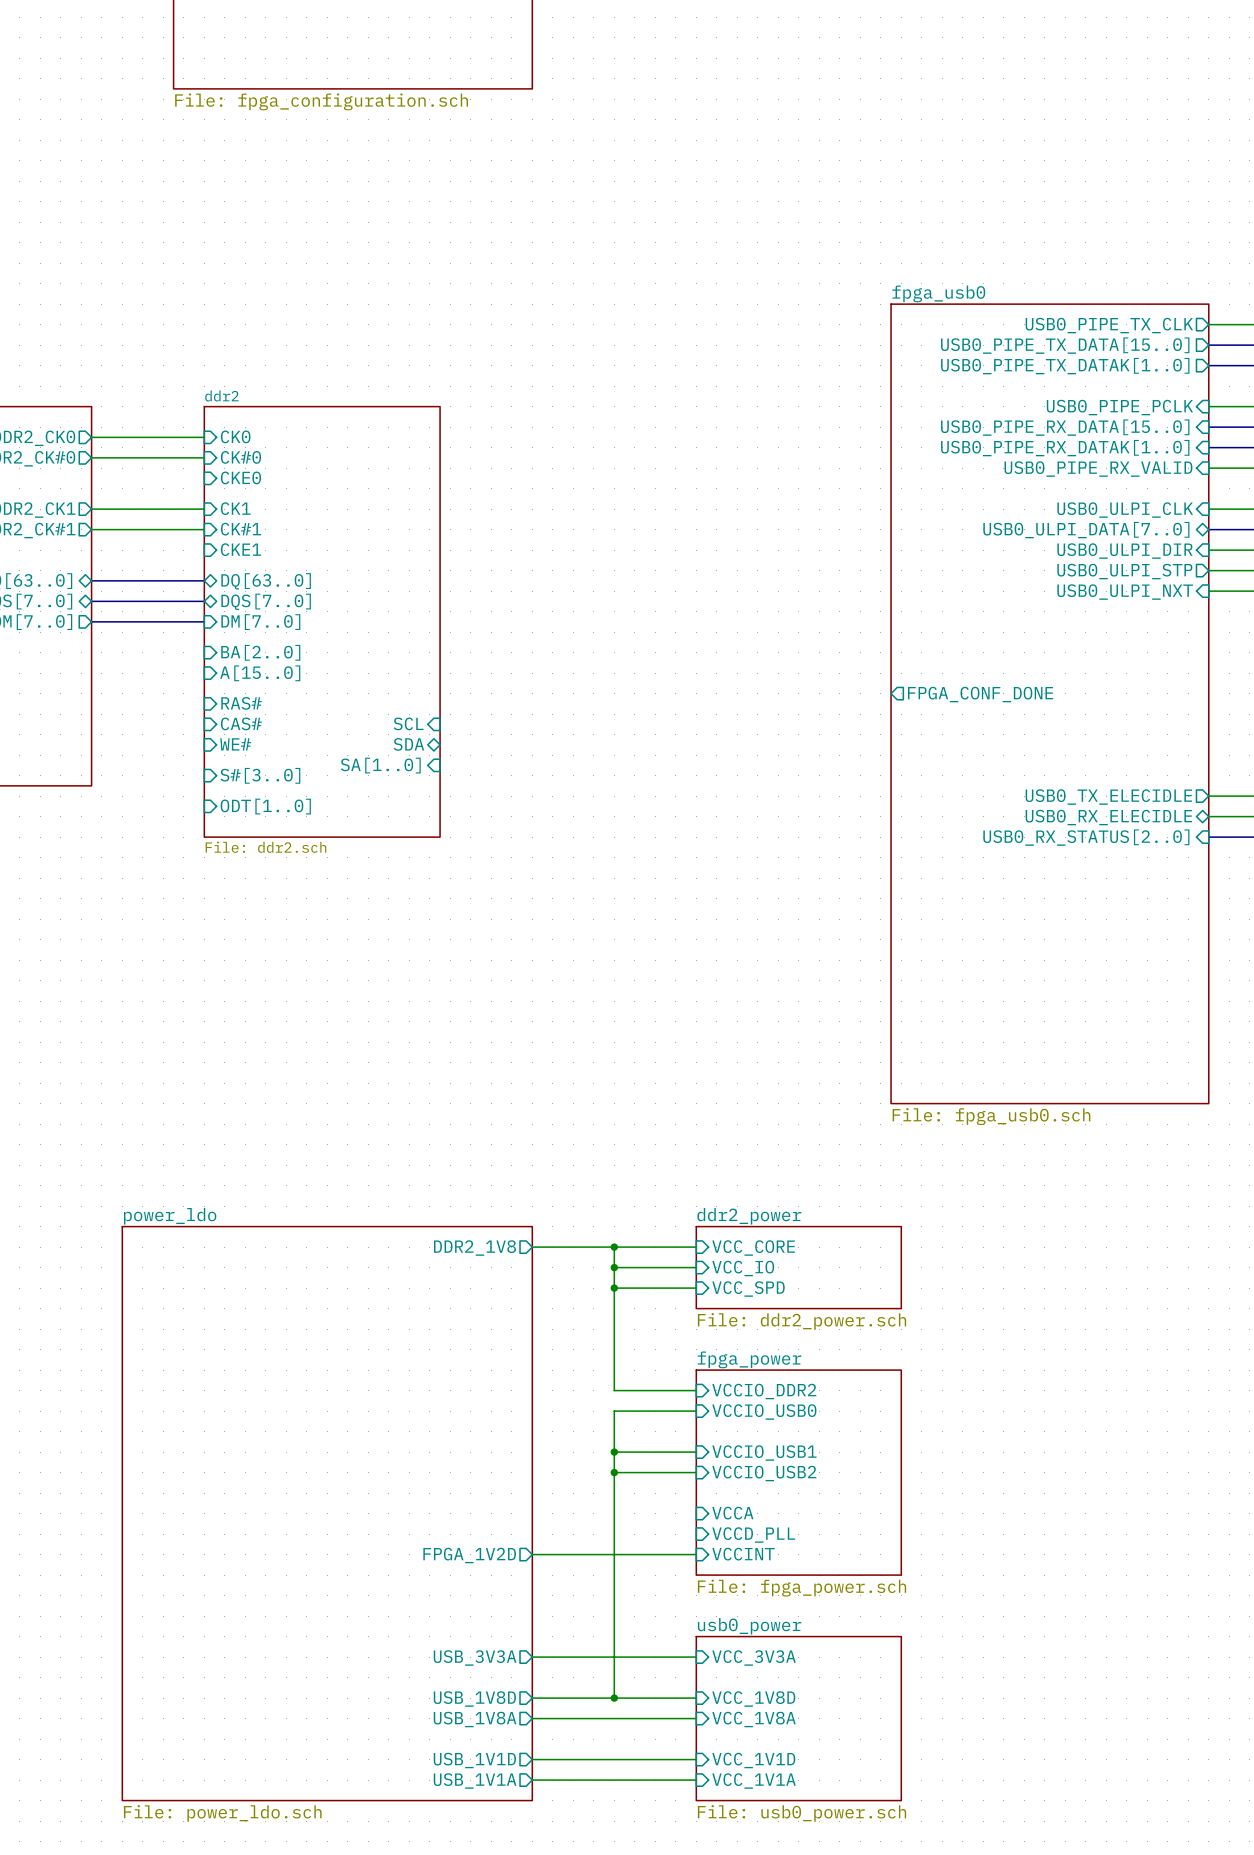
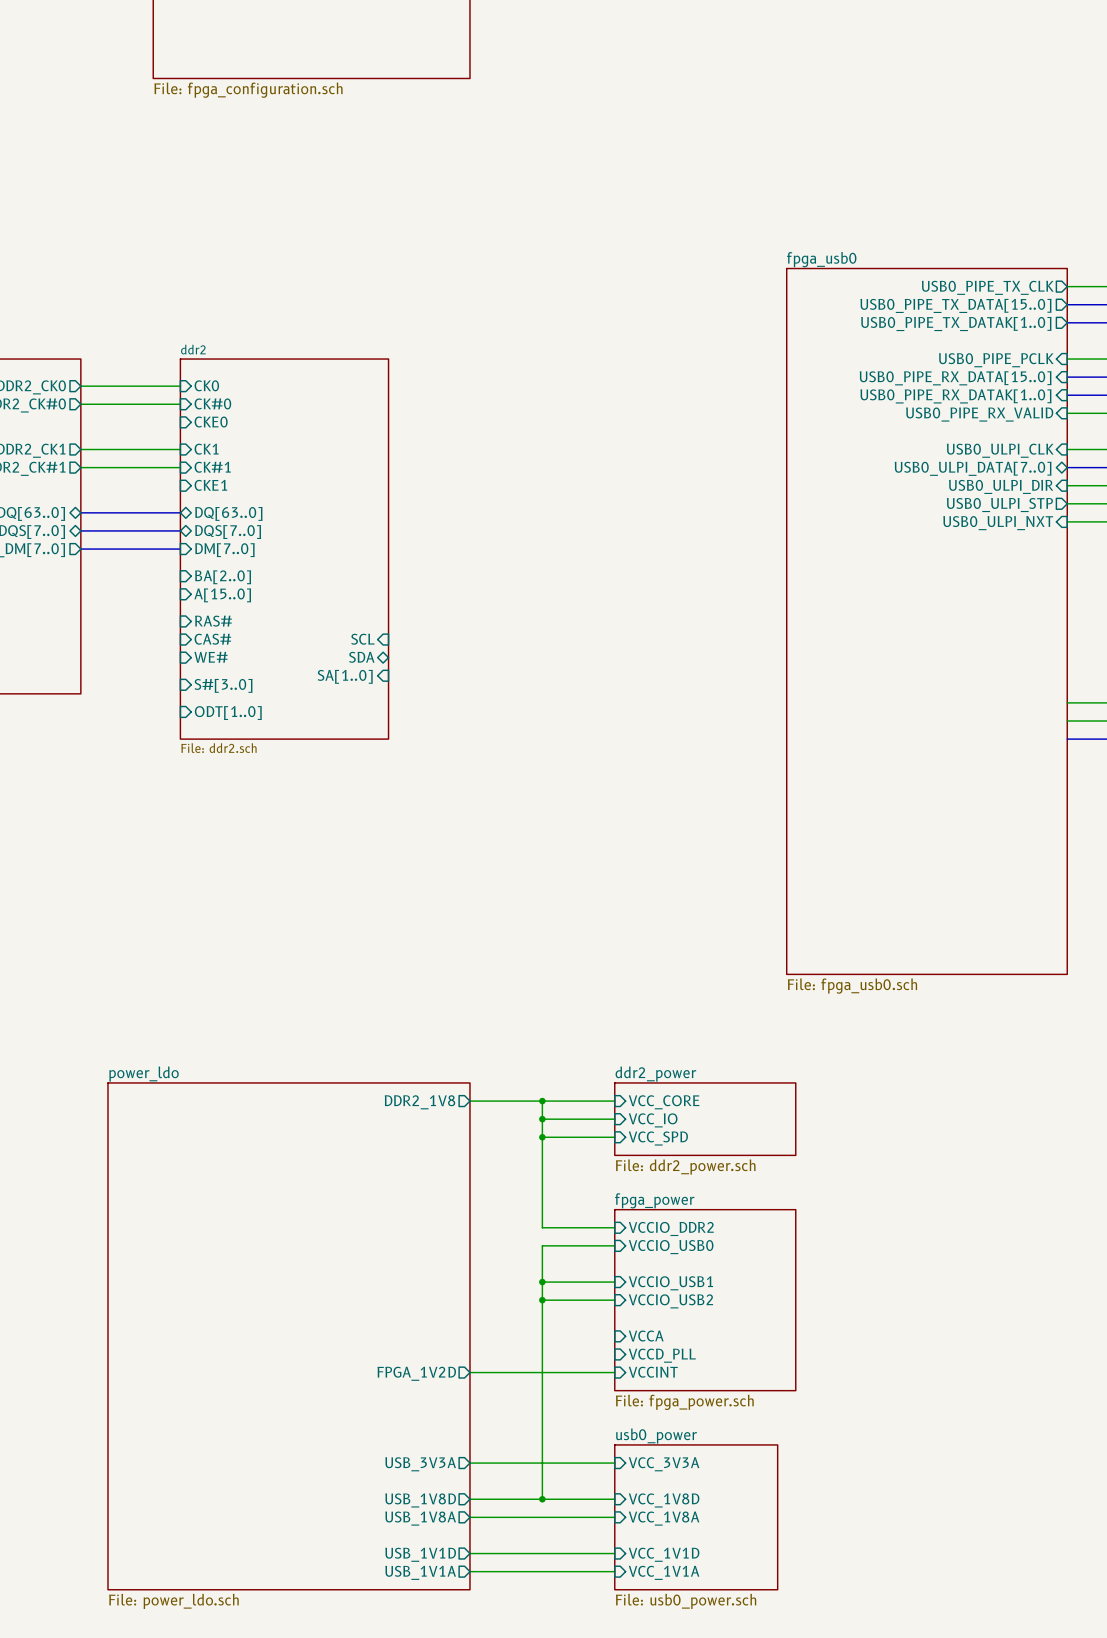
sheet pin: FPGA_CONF_DONE (980, 694) -> none
sheet pin: USB0_TX_ELECIDLE (1108, 797) -> none
sheet pin: USB0_RX_ELECIDLE (1108, 817) -> none
sheet pin: USB0_RX_STATUS[2..0] (1086, 837) -> none
sheet usb0_power shape: [696, 1636, 902, 1801] -> [614, 1444, 778, 1590]

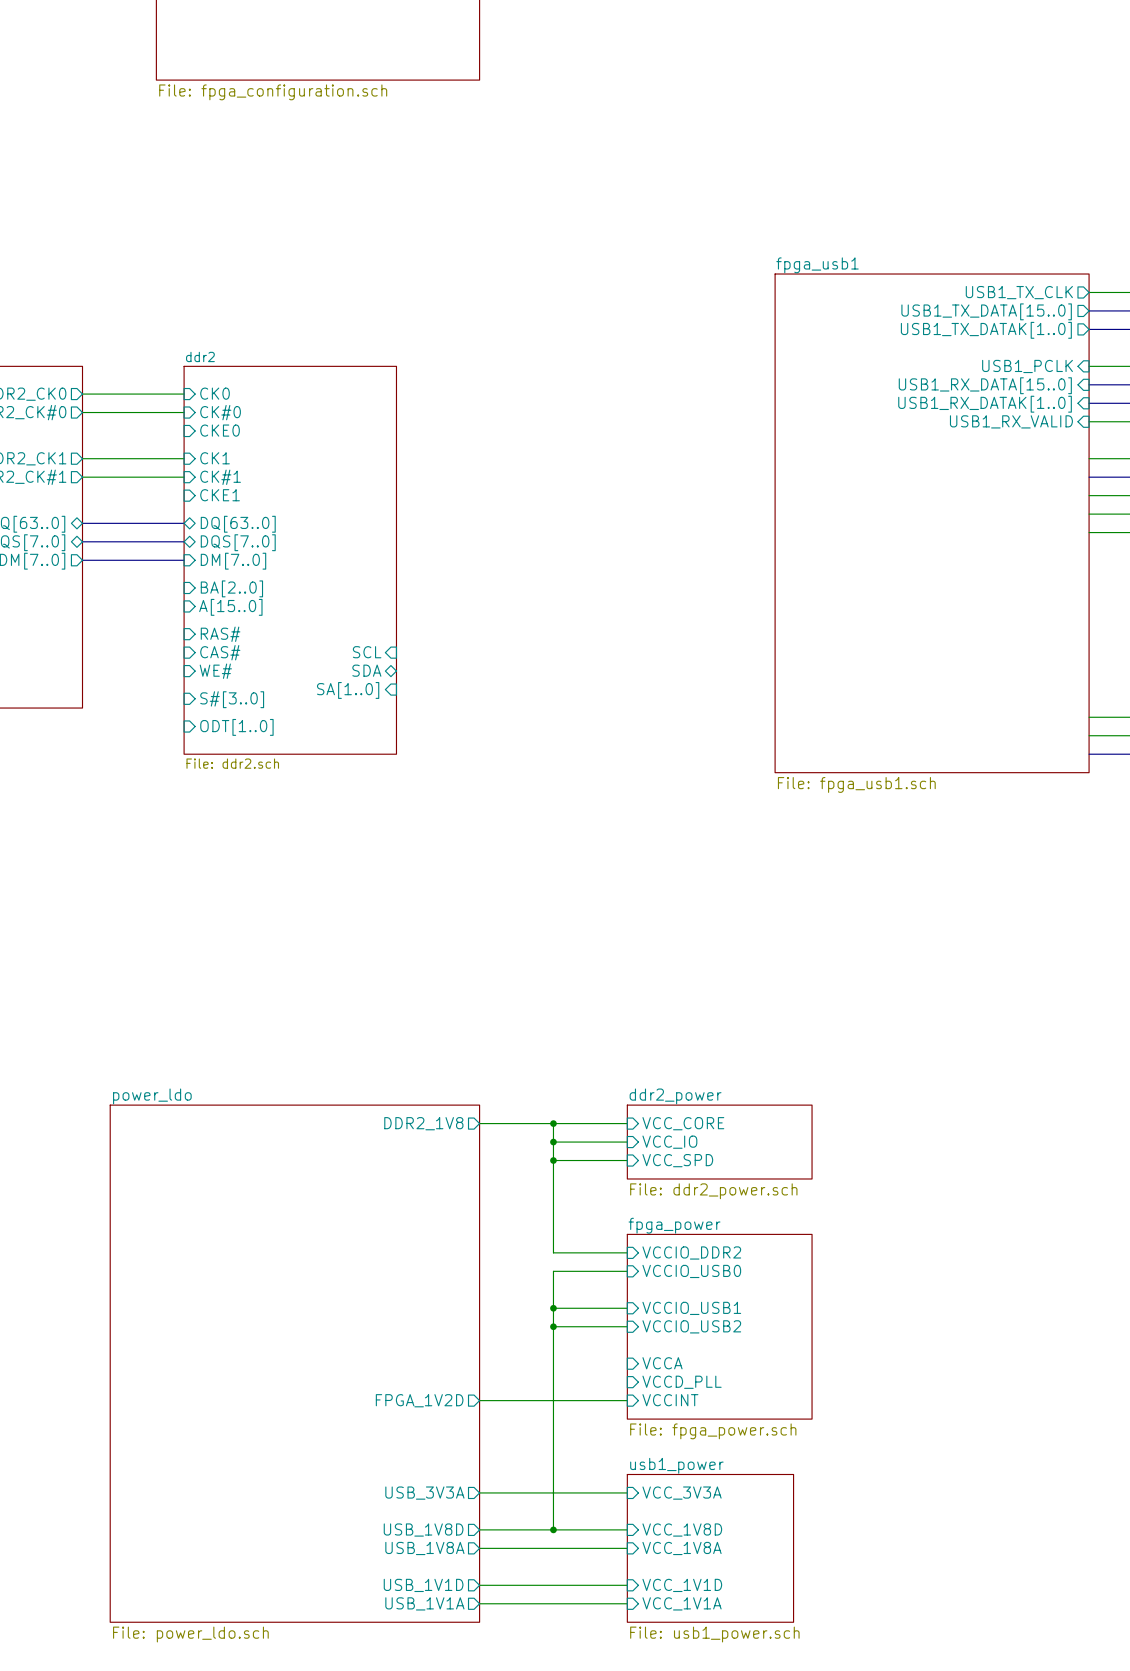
sheet pin: USB0_PIPE_TX_CLK (987, 287) -> USB1_TX_CLK (1019, 292)
sheet pin: USB0_PIPE_TX_DATA[15..0] (955, 305) -> USB1_TX_DATA[15..0] (986, 311)
sheet pin: USB0_PIPE_TX_DATAK[1..0] (956, 324) -> USB1_TX_DATAK[1..0] (986, 330)
sheet pin: USB0_PIPE_PCLK (996, 360) -> USB1_PCLK (1027, 366)
sheet pin: USB0_PIPE_RX_DATA[15..0] (955, 378) -> USB1_RX_DATA[15..0] (985, 385)
sheet pin: USB0_PIPE_RX_DATAK[1..0] (955, 396) -> USB1_RX_DATAK[1..0] (985, 404)
sheet pin: USB0_PIPE_RX_VALID (979, 414) -> USB1_RX_VALID (1011, 421)
sheet pin: USB0_ULPI_CLK (1000, 450) -> none
sheet pin: USB0_ULPI_DATA[7..0] (973, 468) -> none
sheet pin: USB0_ULPI_DIR (1001, 486) -> none
sheet pin: USB0_ULPI_STP (999, 505) -> none
sheet fpga_usb1: none -> File: fpga_usb1.sch (932, 523)
sheet pin: USB0_ULPI_NXT (998, 523) -> none
sheet fpga_usb0: File: fpga_usb0.sch (926, 621) -> none
sheet usb0_power name: usb0_power (656, 1436) -> usb1_power (676, 1465)
sheet usb0_power value: File: usb0_power.sch (686, 1601) -> File: usb1_power.sch (714, 1634)

